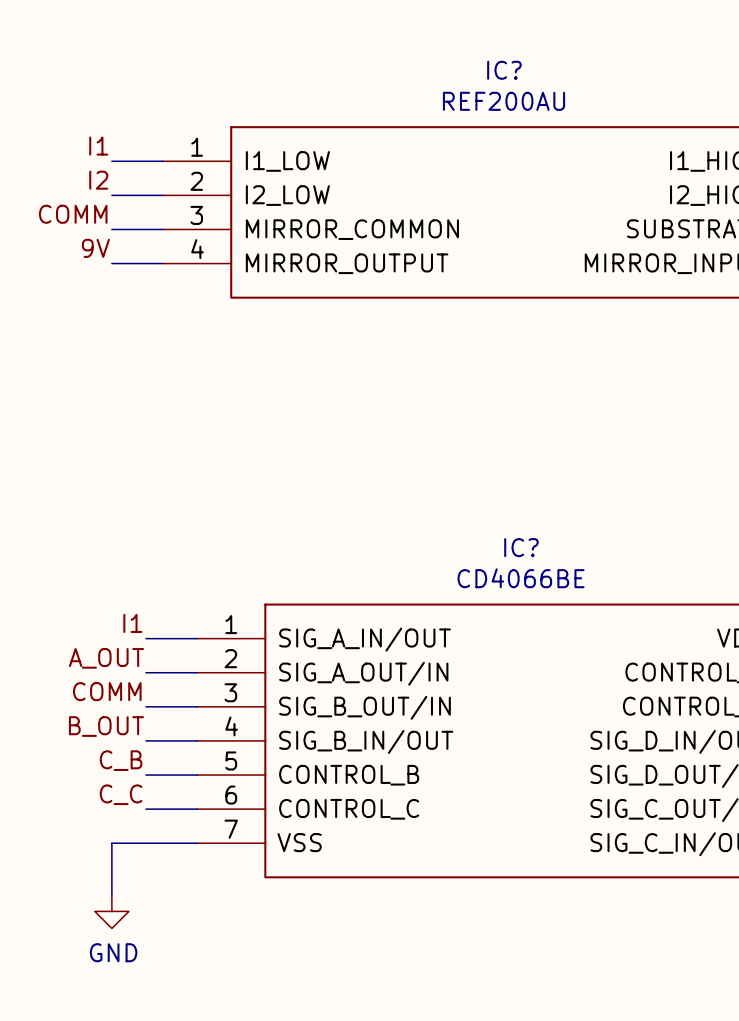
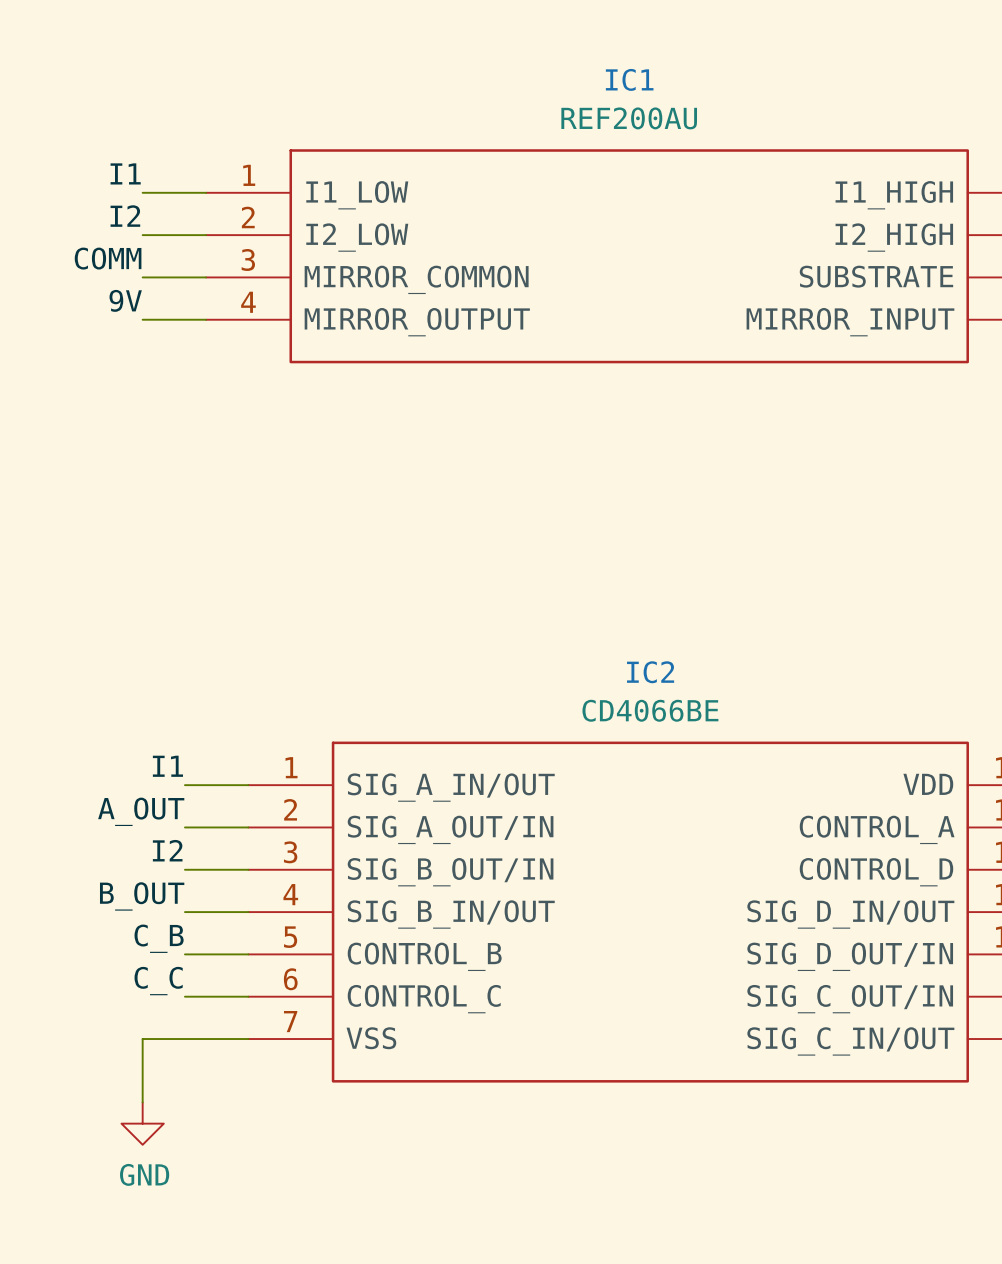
IC? name: IC? (504, 70) -> IC1 (629, 79)
IC? name: IC? (521, 547) -> IC2 (650, 672)
label: COMM (107, 691) -> I2 (167, 850)

